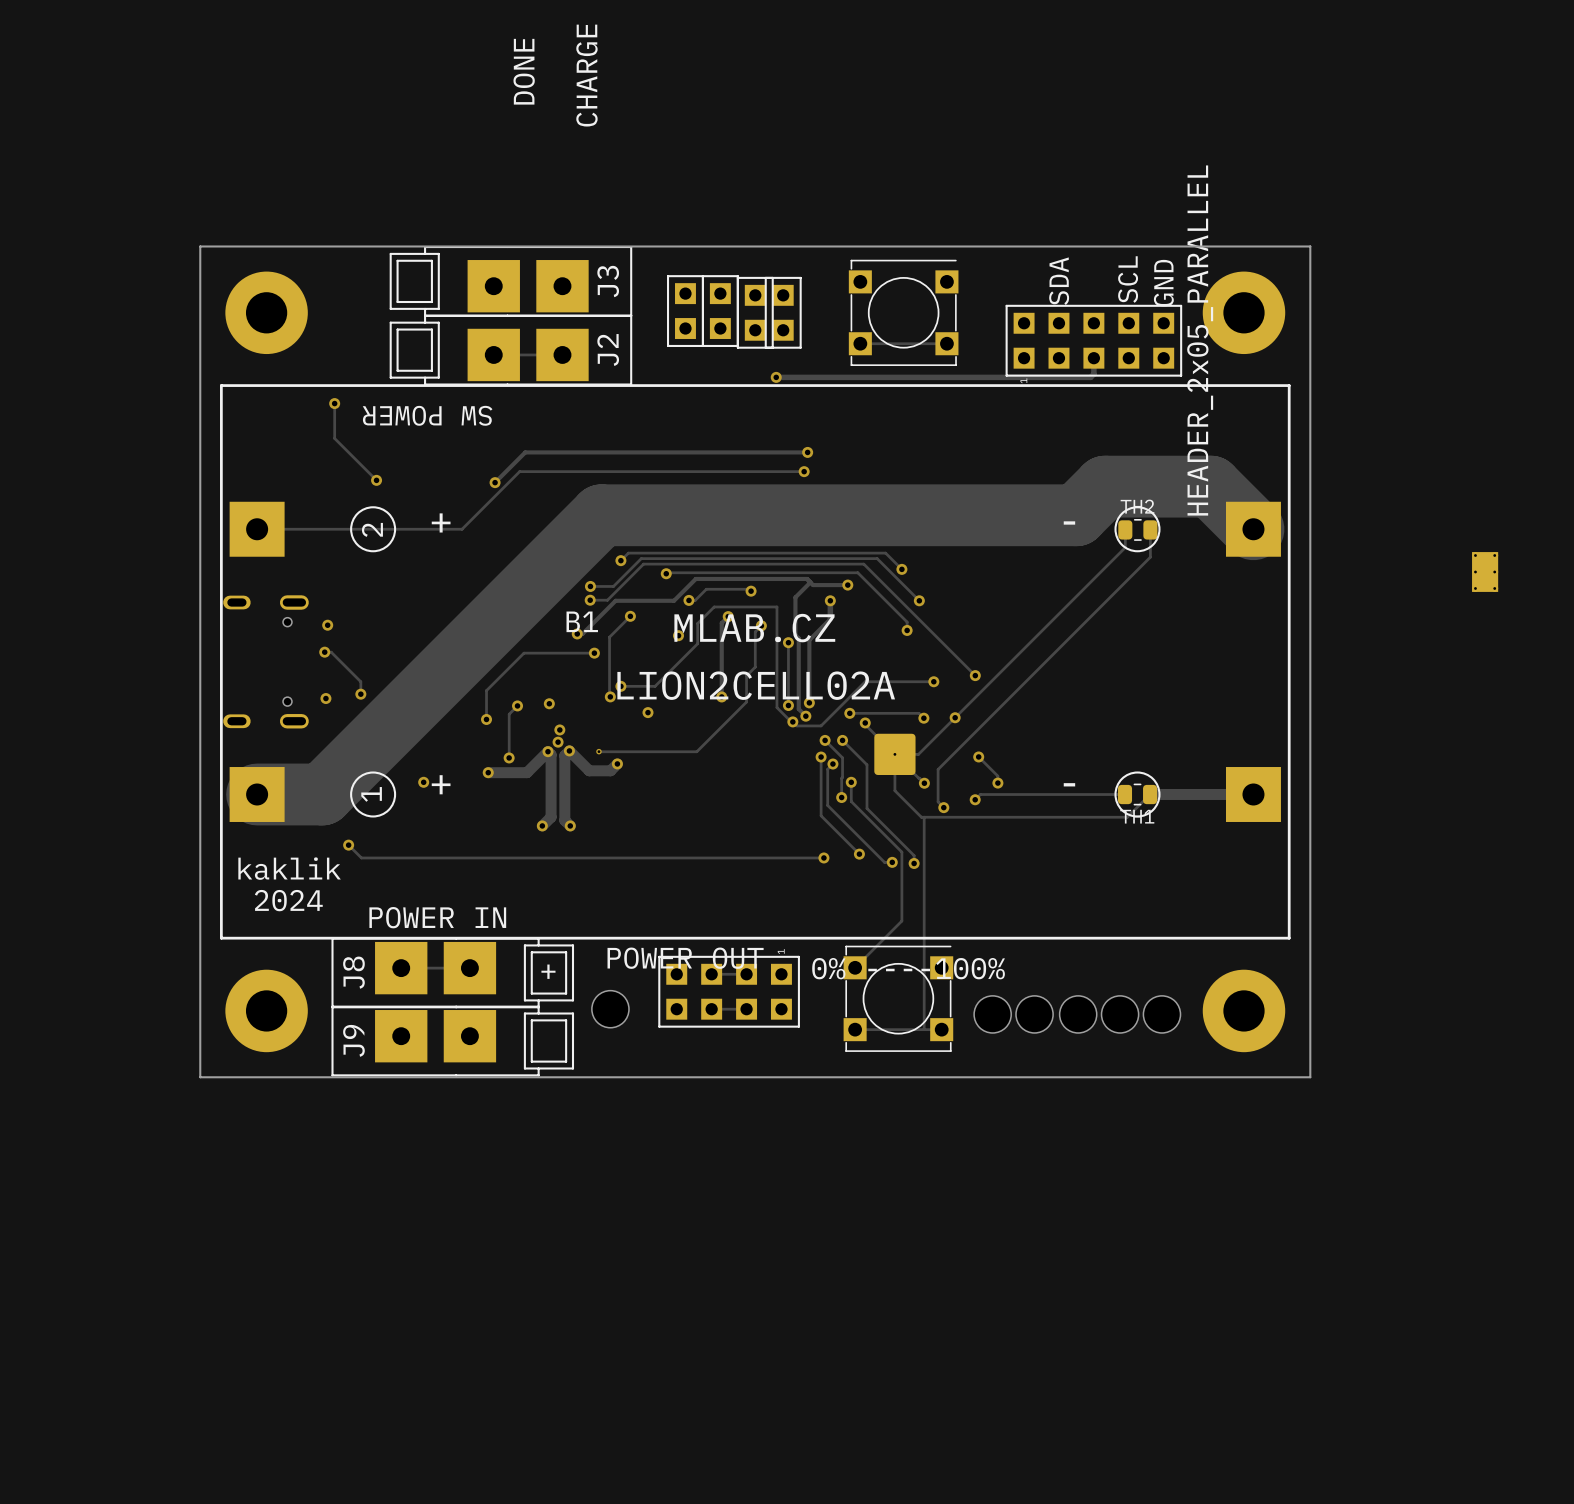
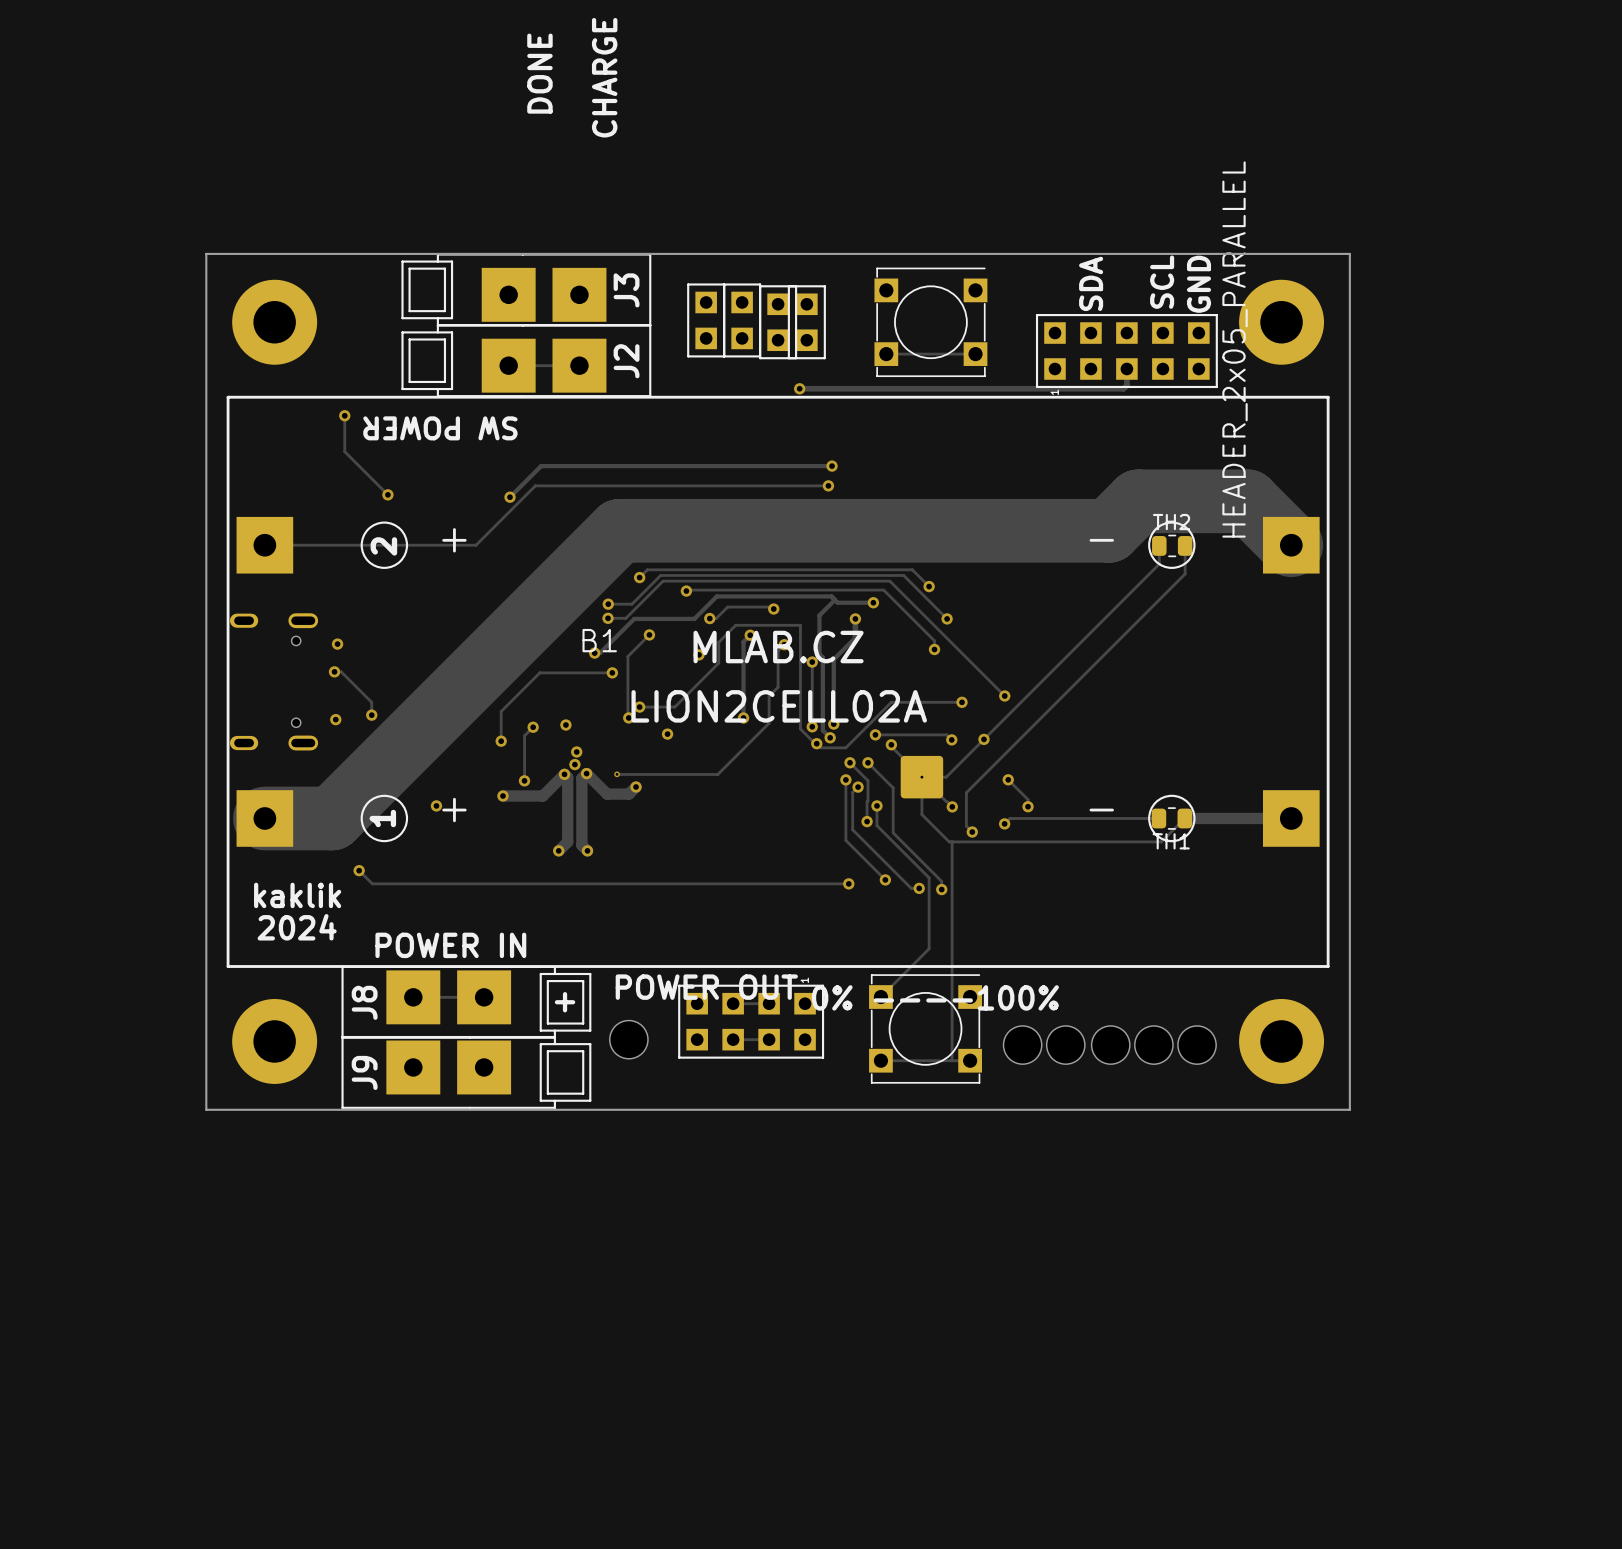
part: (1485, 571) -> none

